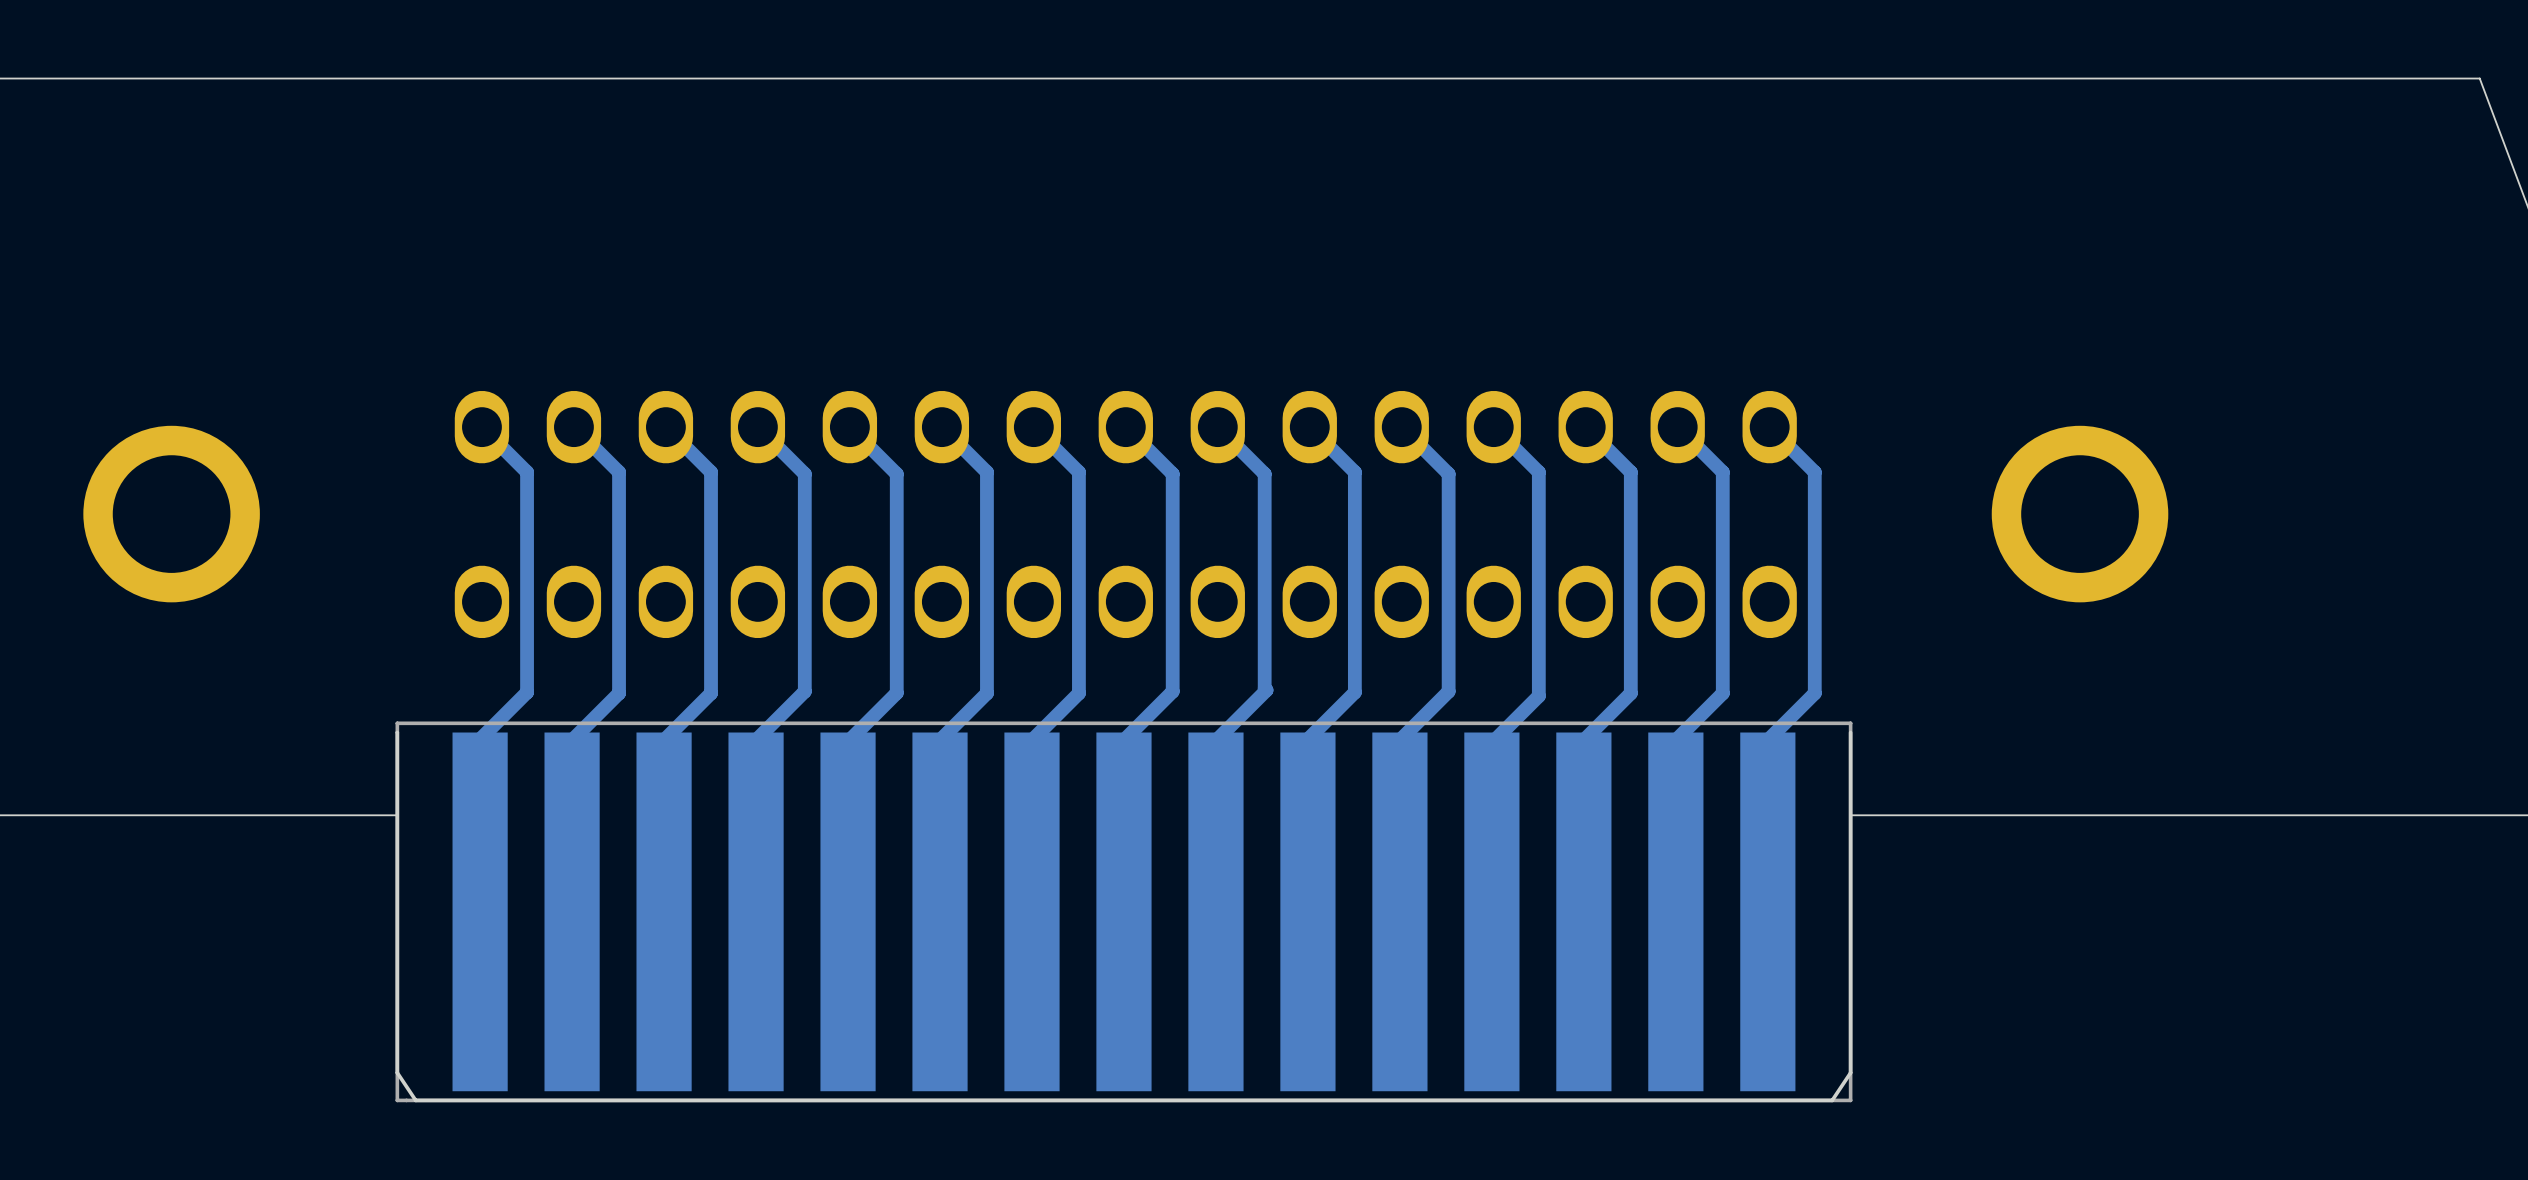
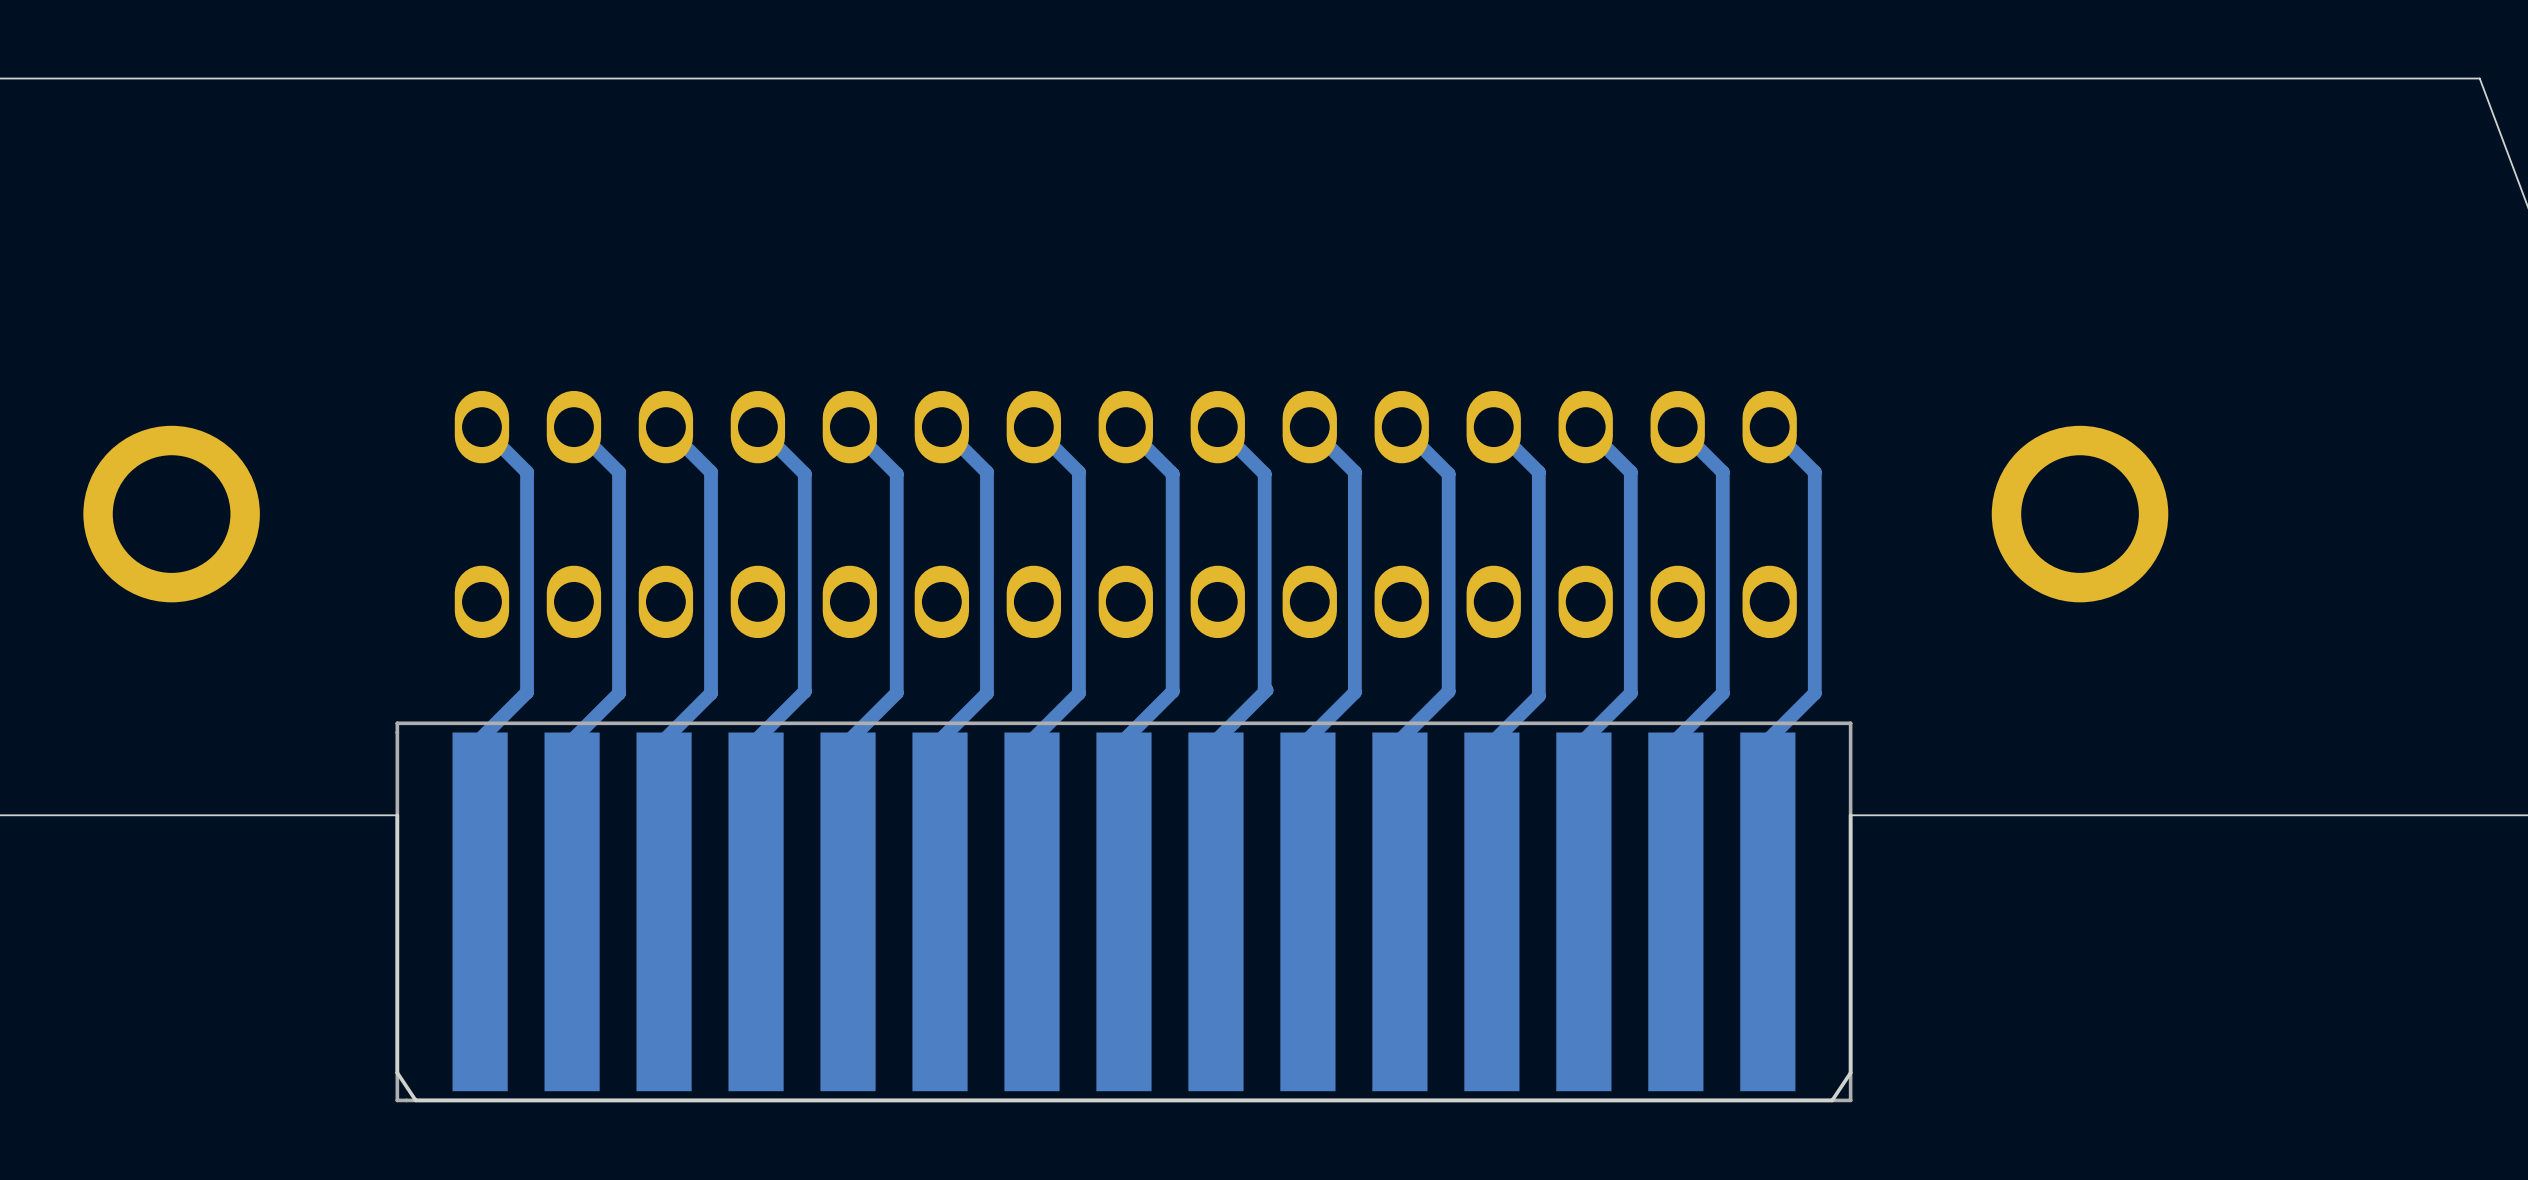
part footprint: [395, 721, 1853, 1103] -> [395, 721, 1853, 1103]

